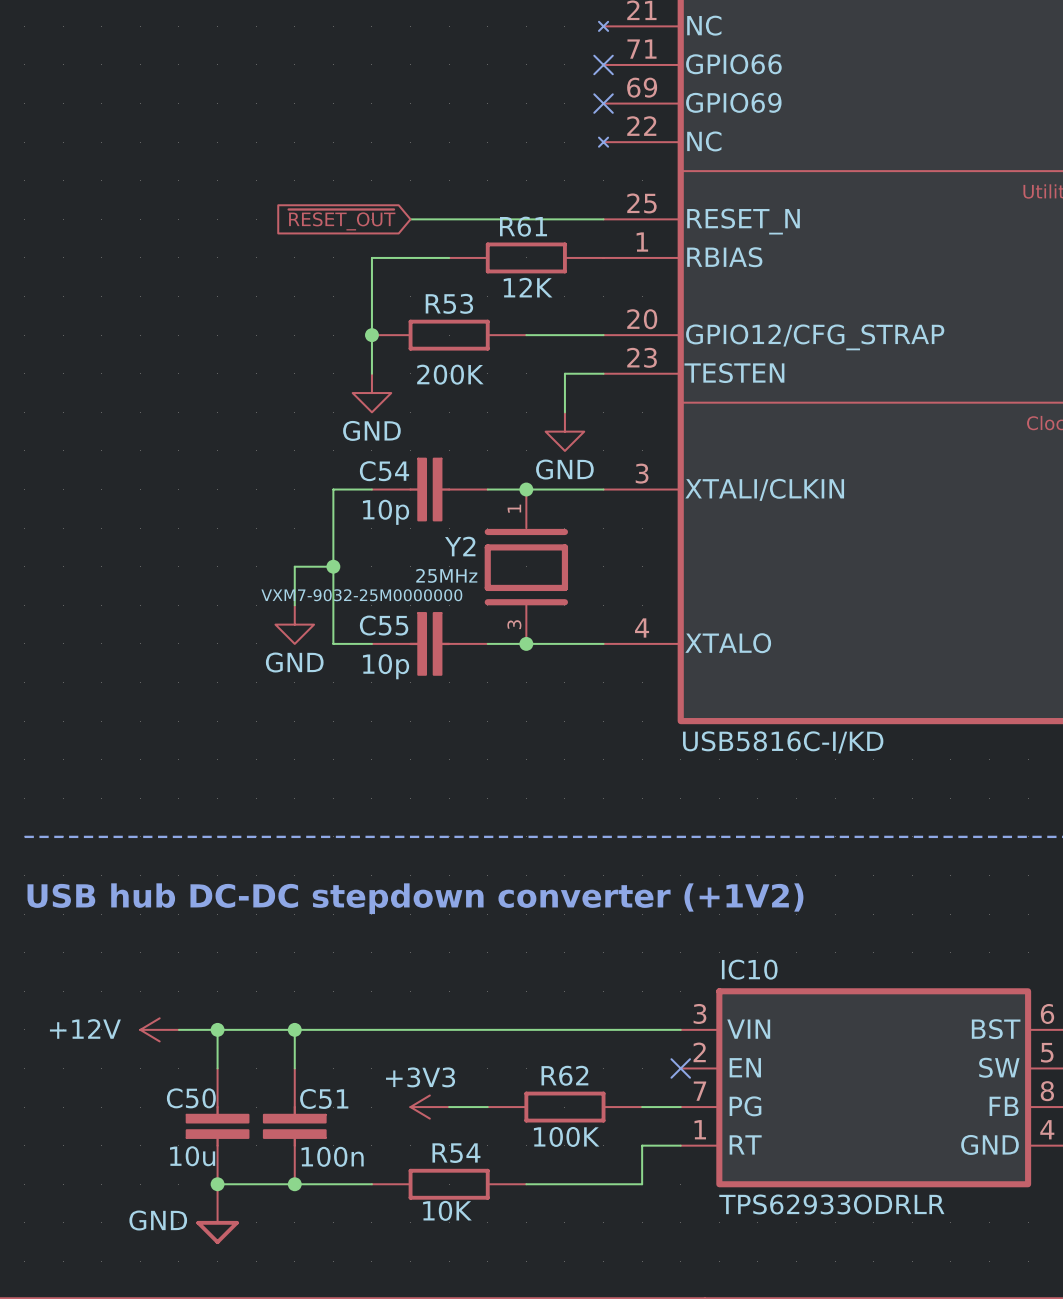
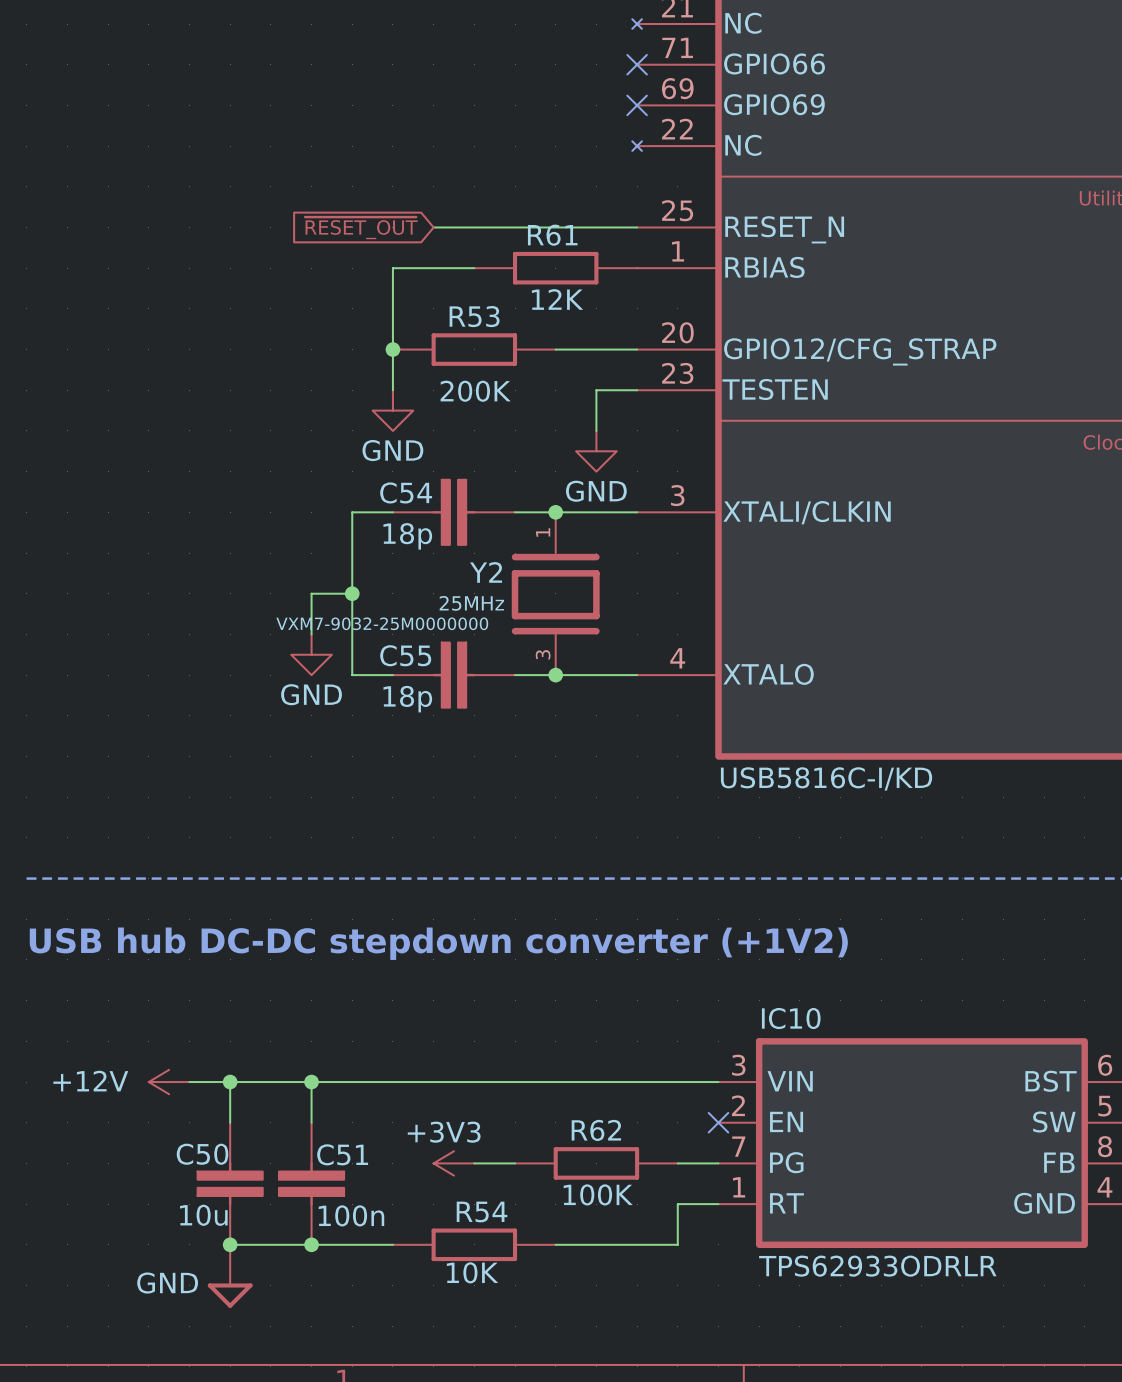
C54 value: 10p (386, 512) -> 18p (407, 536)
C55 value: 10p (386, 666) -> 18p (407, 699)

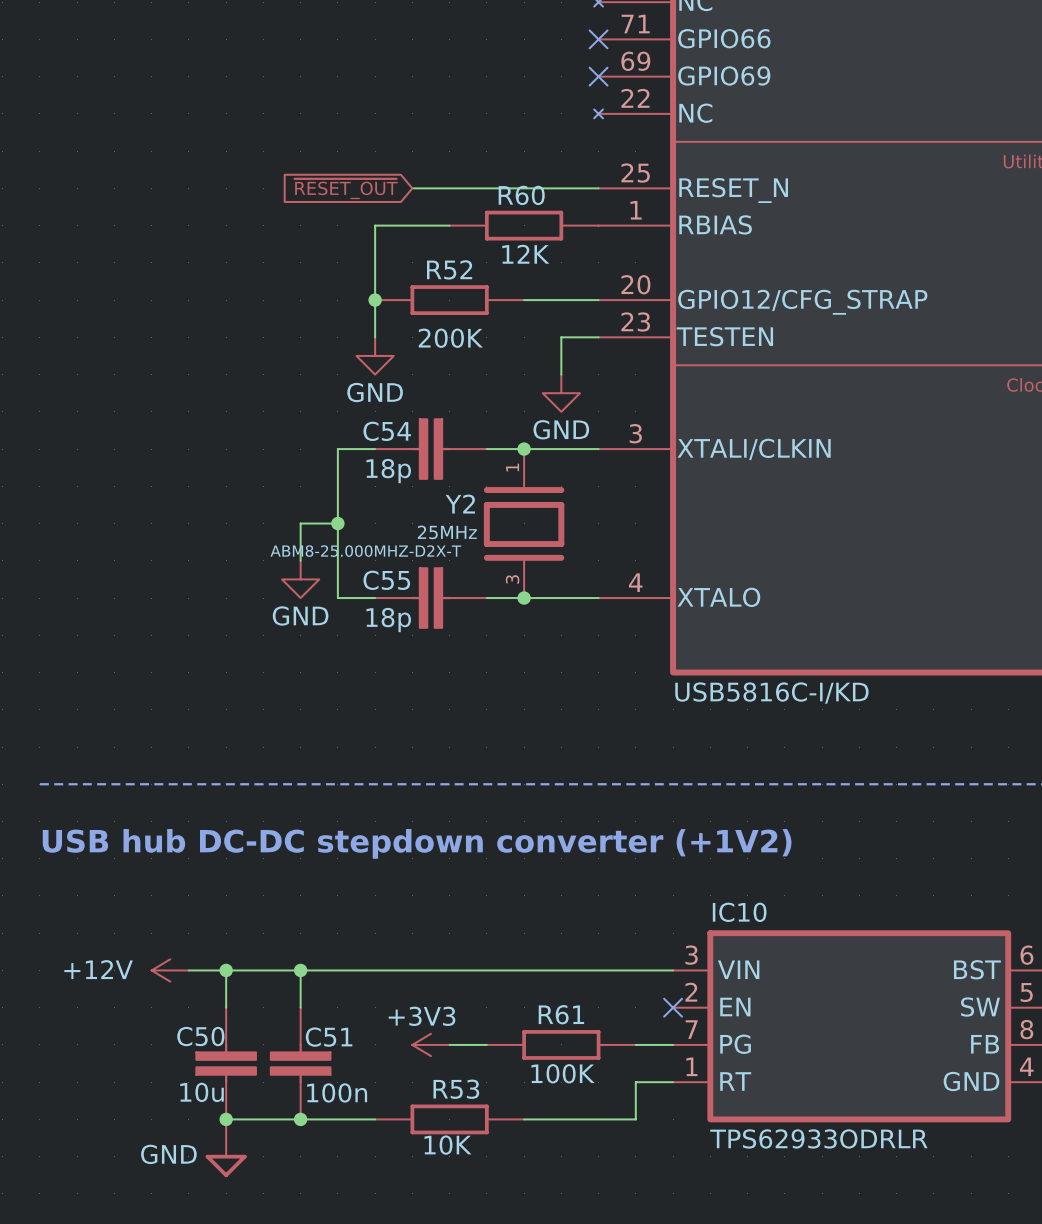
R61 name: R61 (552, 235) -> R60 (521, 195)
R53 name: R53 (474, 316) -> R52 (449, 269)
Y2 value: VXM7-9032-25M0000000 (382, 623) -> ABM8-25.000MHZ-D2X-T (365, 551)
R62 name: R62 (596, 1130) -> R61 (561, 1014)
R54 name: R54 (482, 1211) -> R53 (456, 1089)

